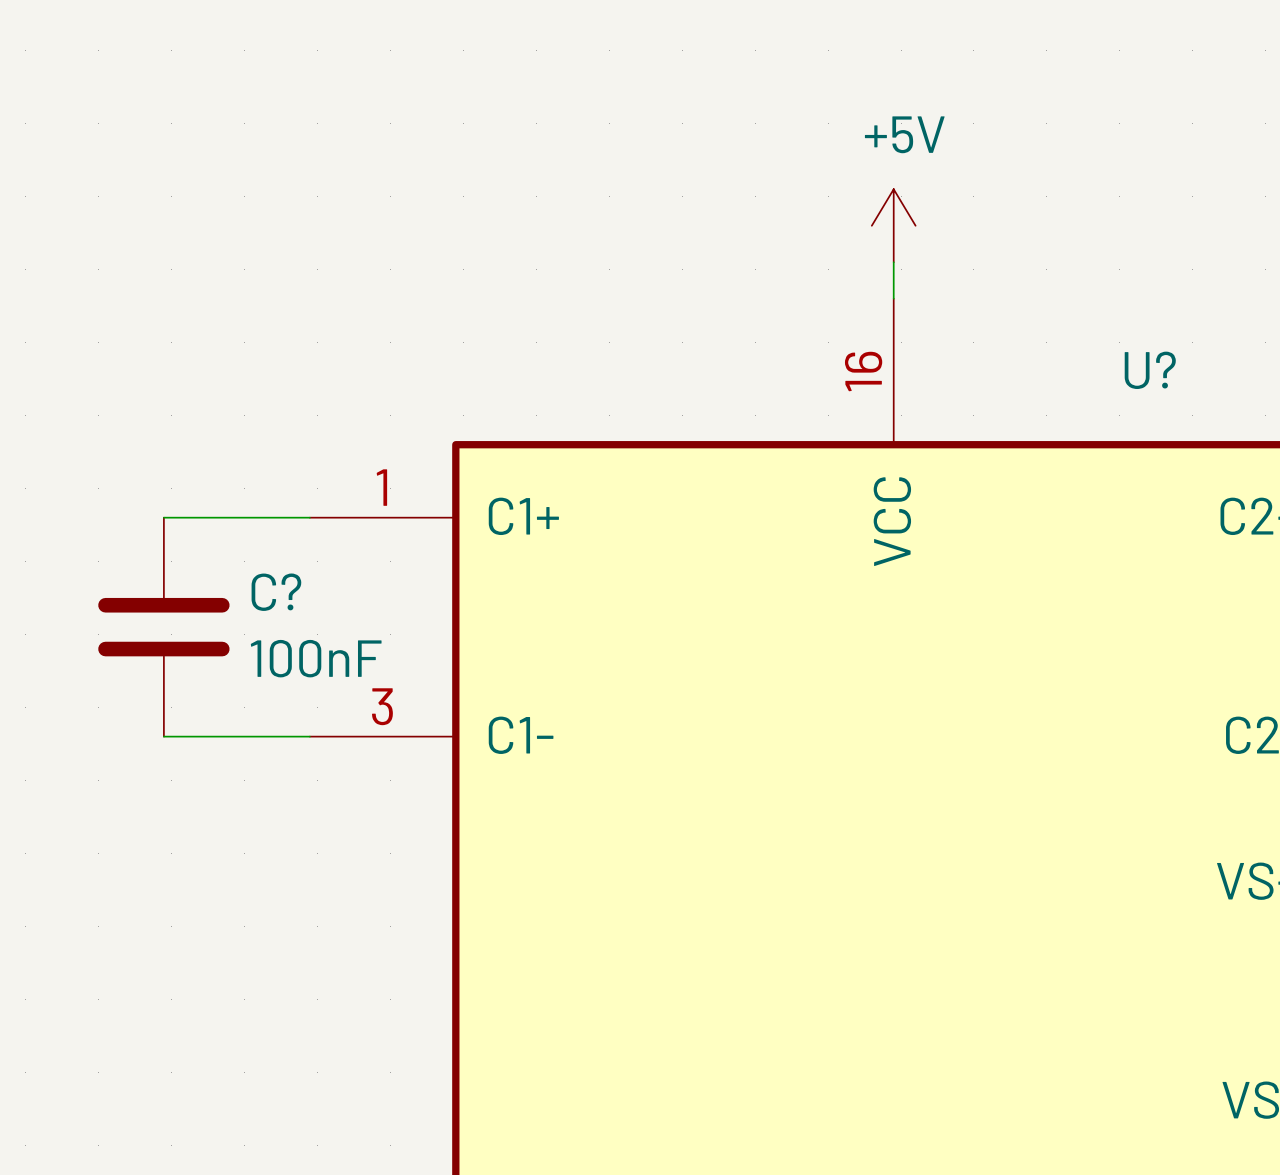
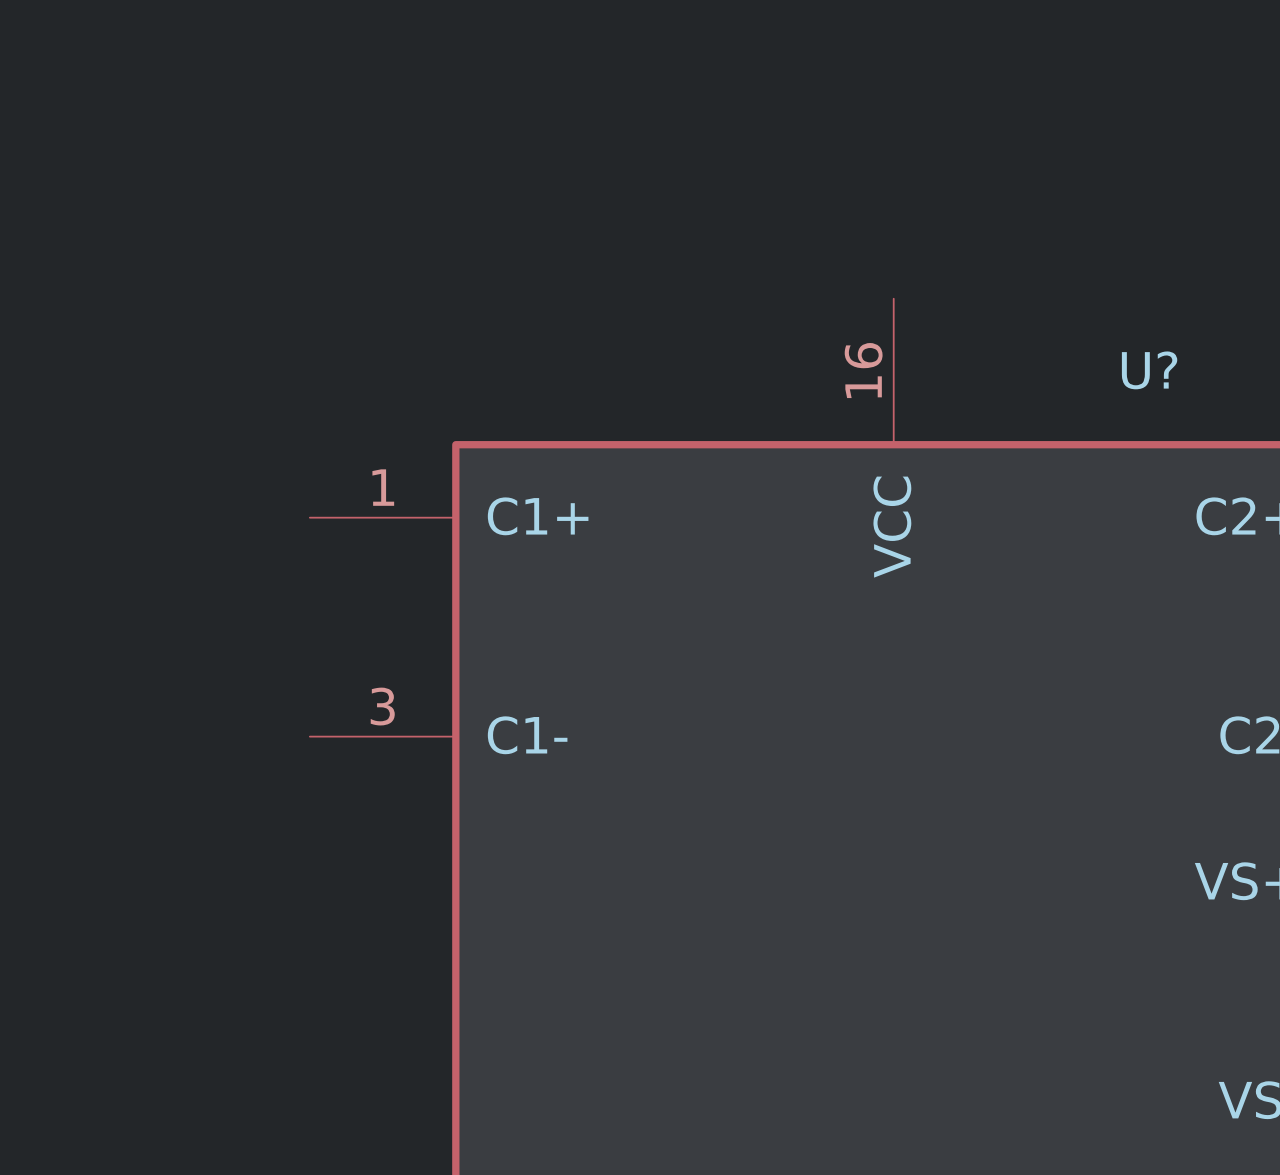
power symbol: +5V (893, 225) -> none
wire: (893, 262) (893, 298) -> none
wire: (163, 517) (309, 517) -> none
C?: 100nF (163, 627) -> none
wire: (163, 736) (309, 736) -> none

